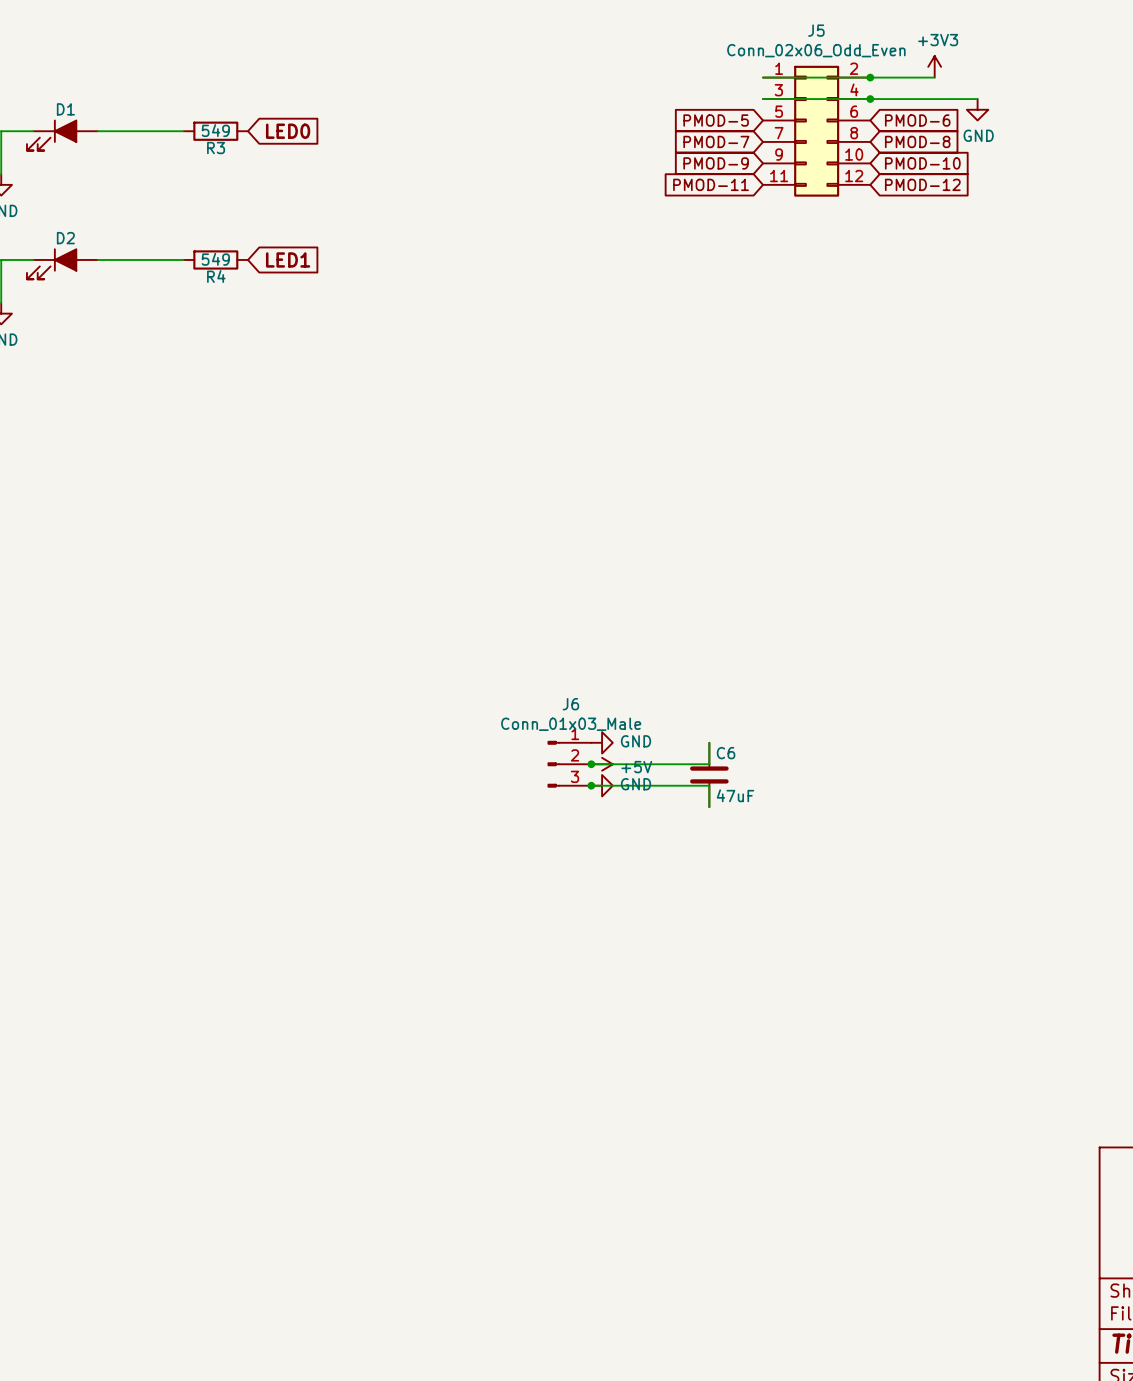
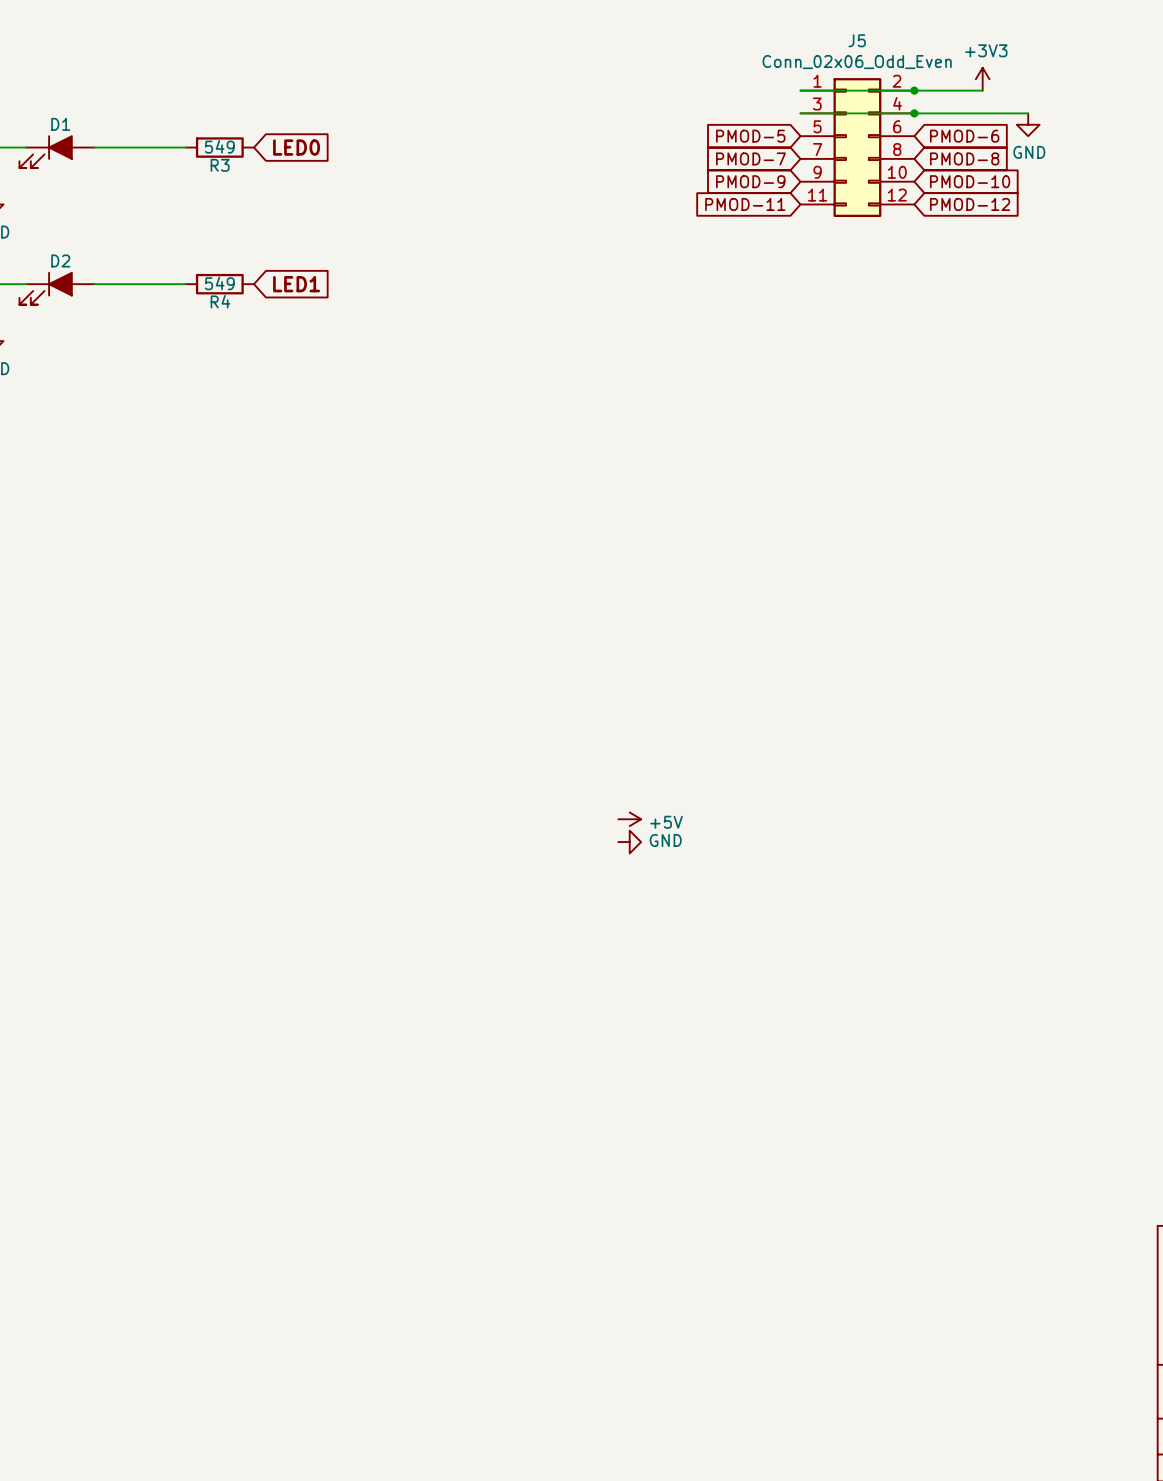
power symbol: GND (602, 742) -> none
wire: (709, 742) (709, 764) (591, 764) -> none
J6: Conn_01x03_Male (569, 764) -> none
junction: (591, 764) -> none
C6: 47uF (709, 774) -> none
wire: (591, 785) (709, 785) (709, 807) -> none
junction: (591, 785) -> none

